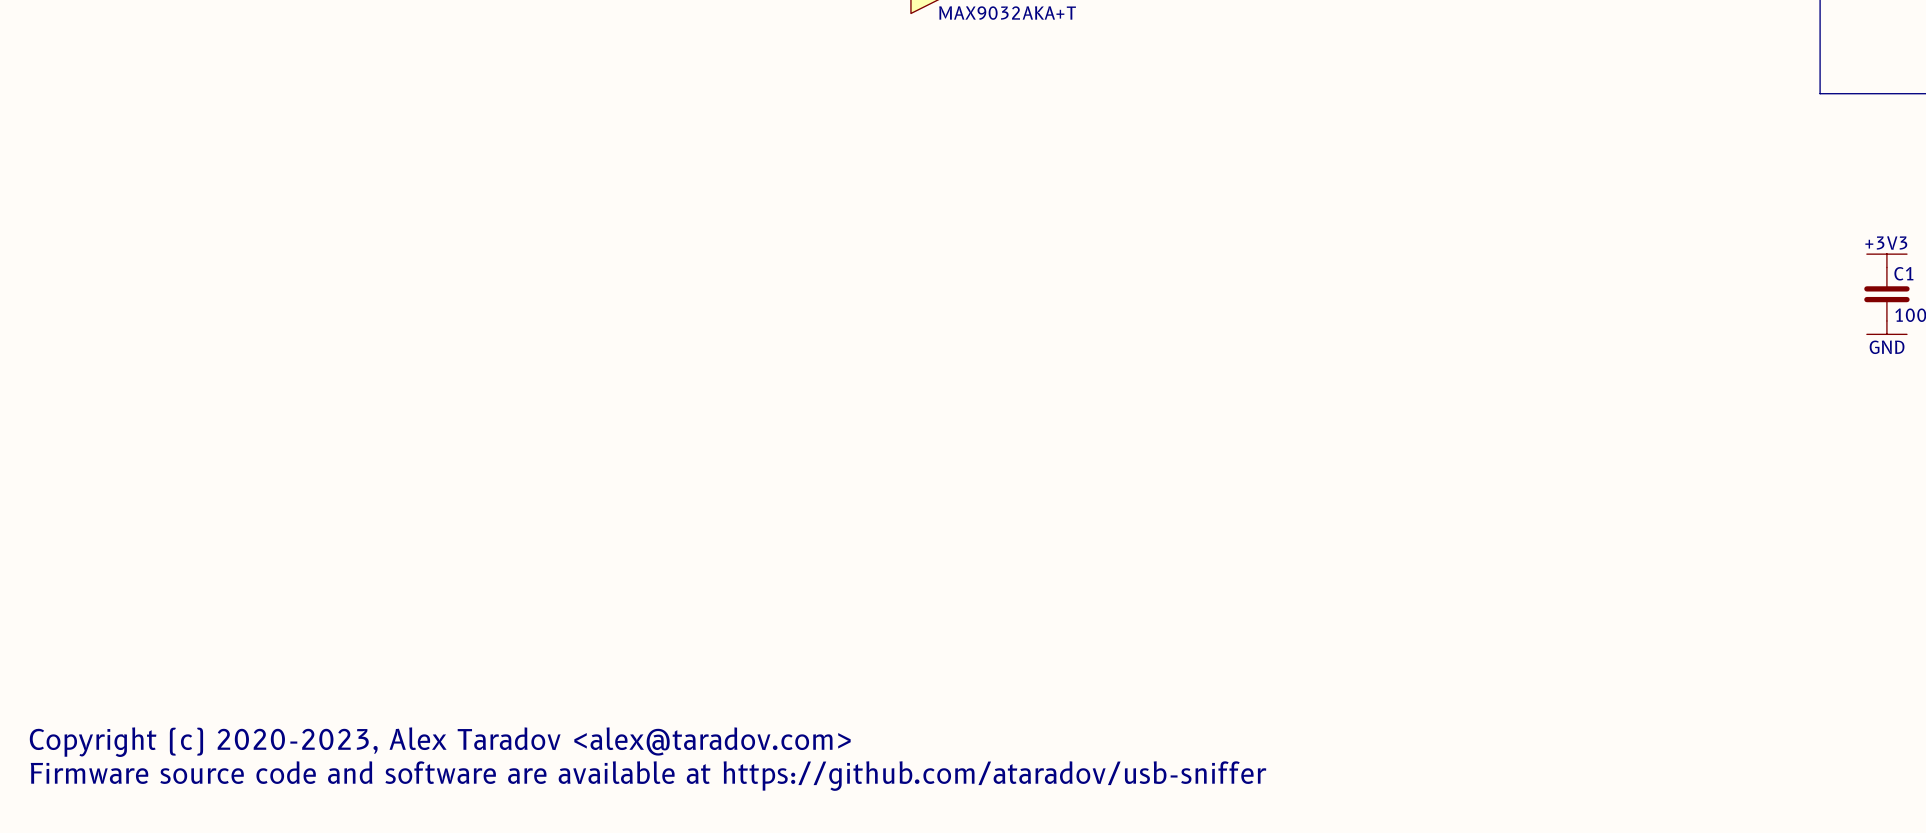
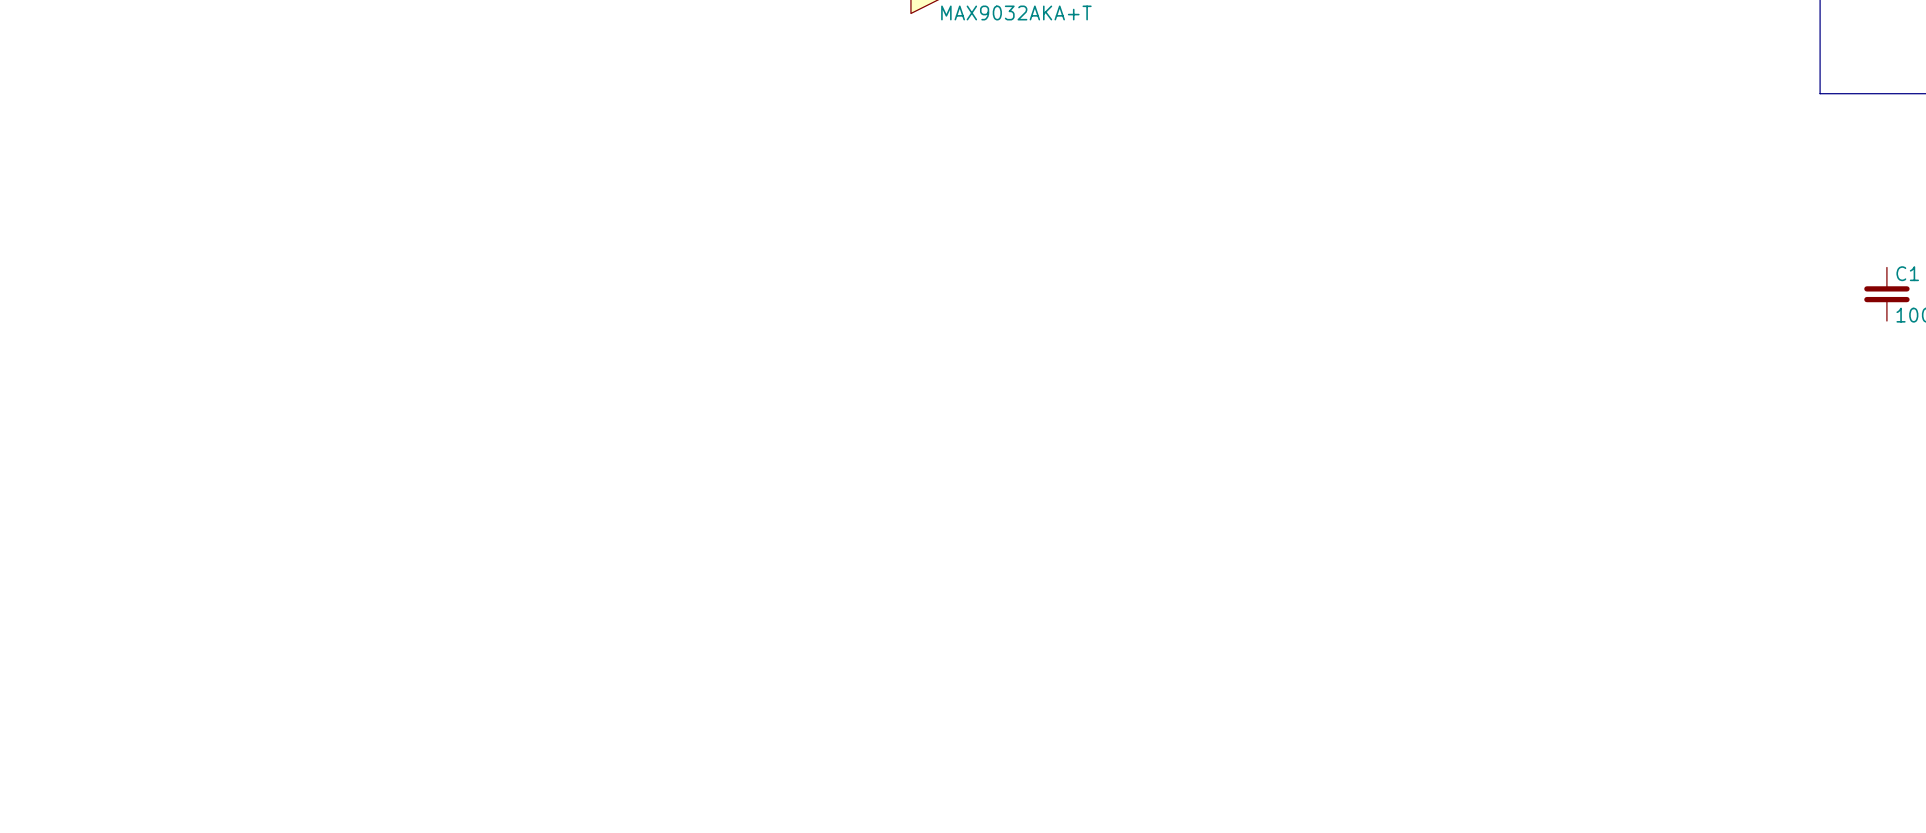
power symbol: +3V3 (1886, 260) -> none
power symbol: GND (1886, 327) -> none
text: Copyright (c) 2020-2023, Alex Taradov <alex@taradov.com> (440, 742) -> none
text: Firmware source code and software are available at https://github.com/ataradov/usb-sniffer (648, 776) -> none

